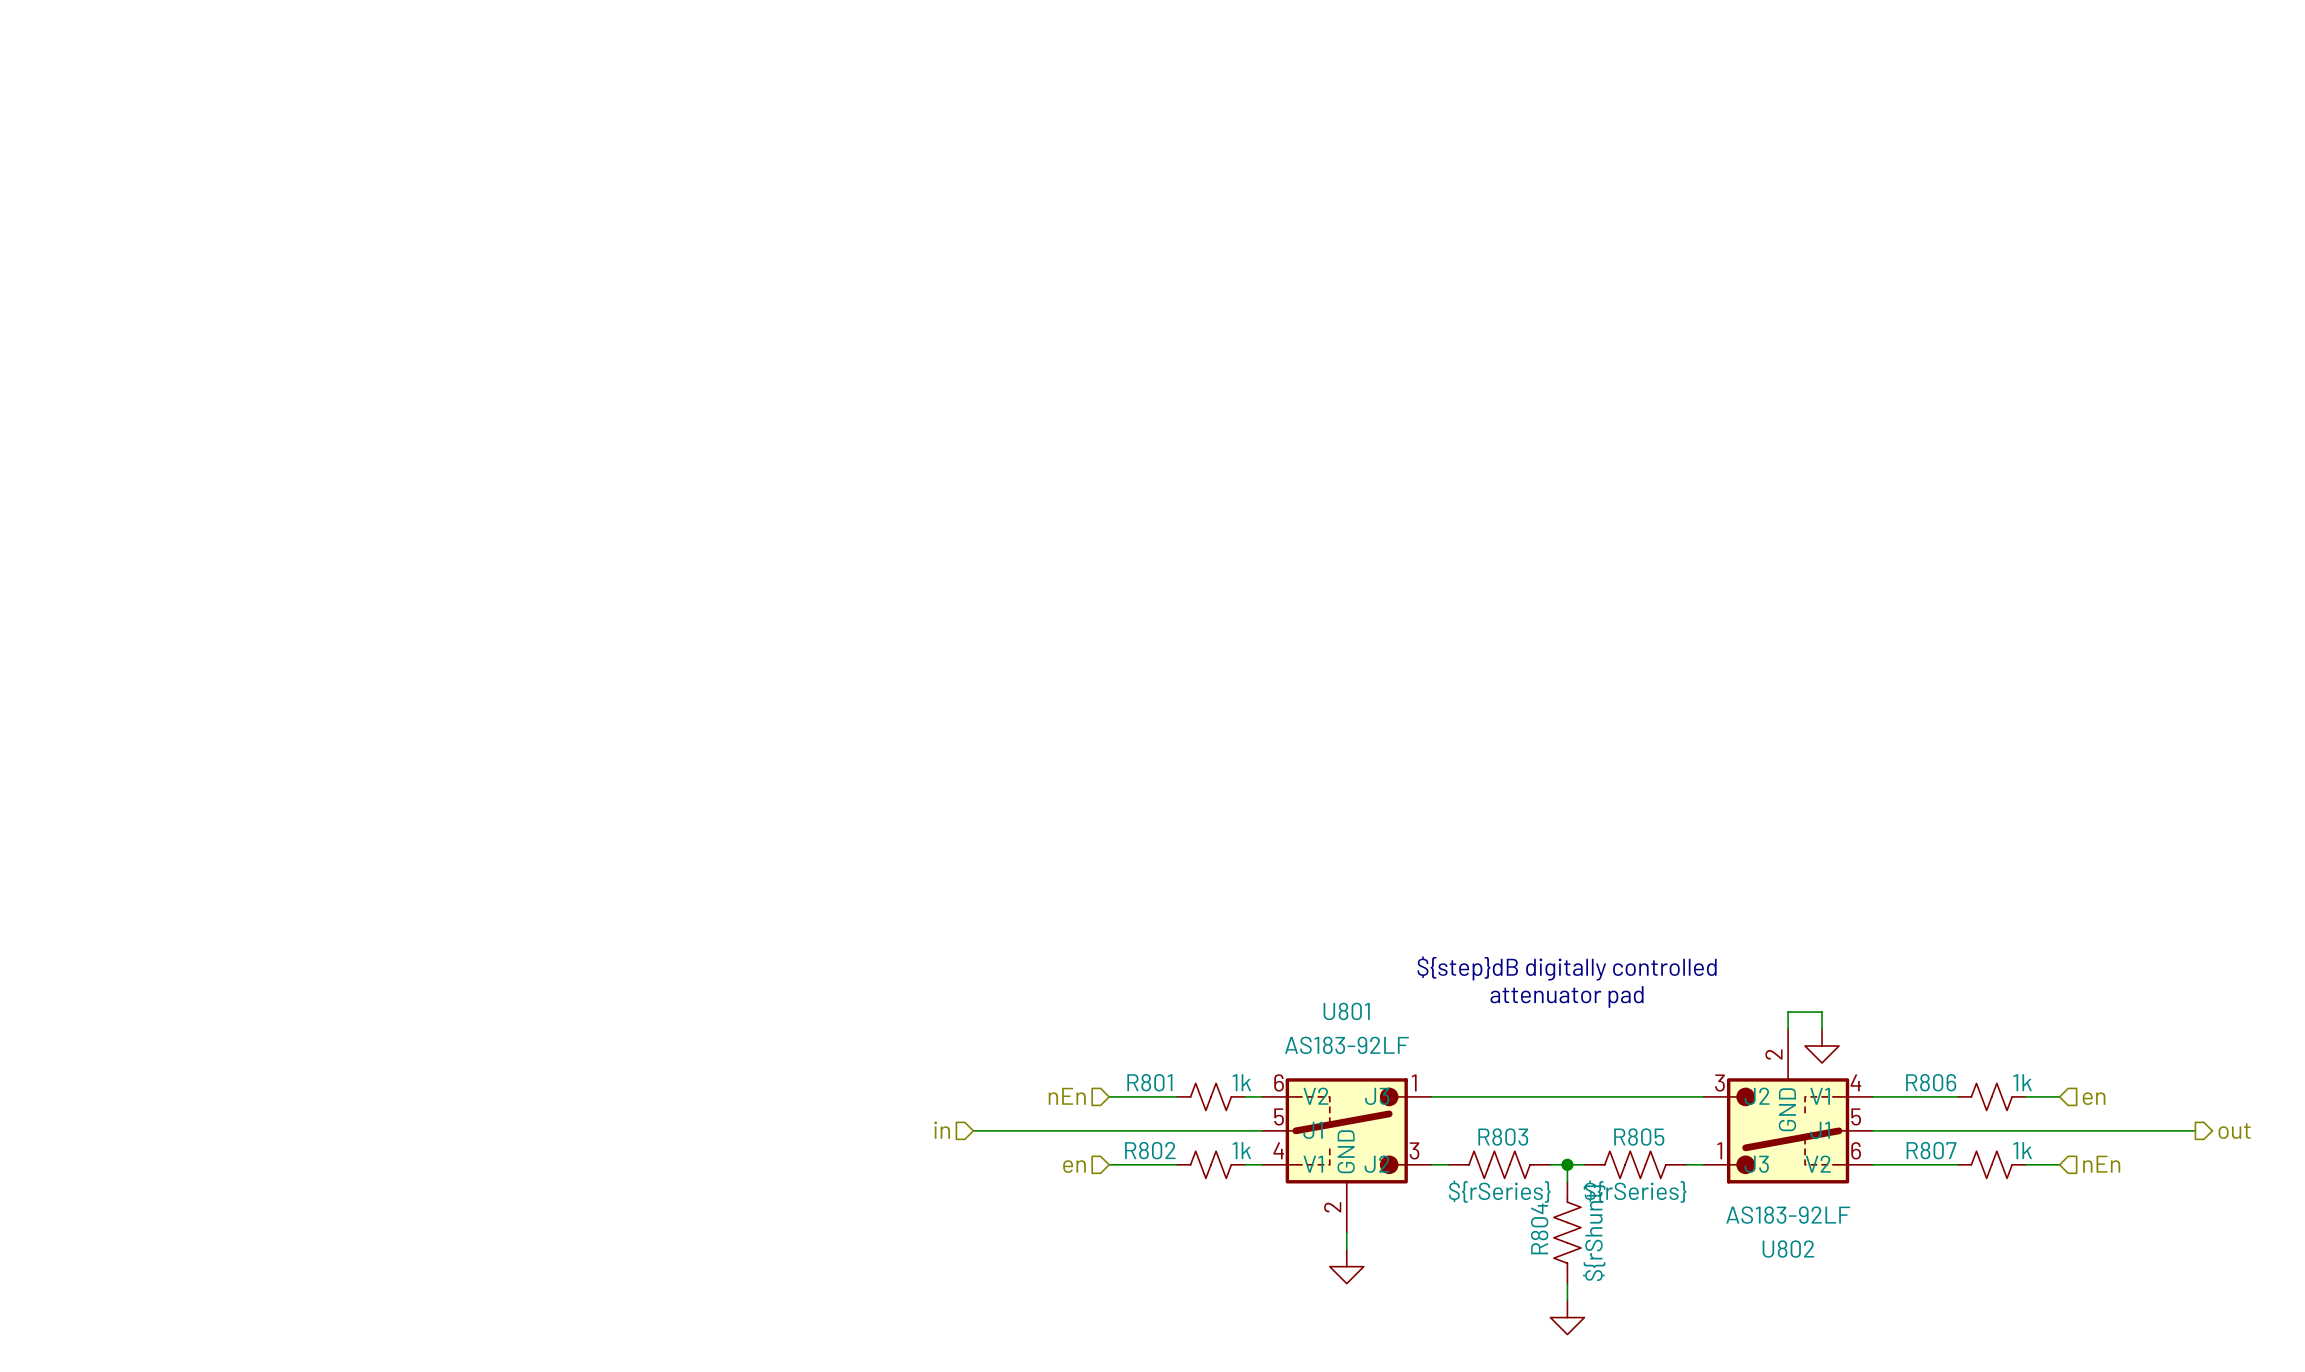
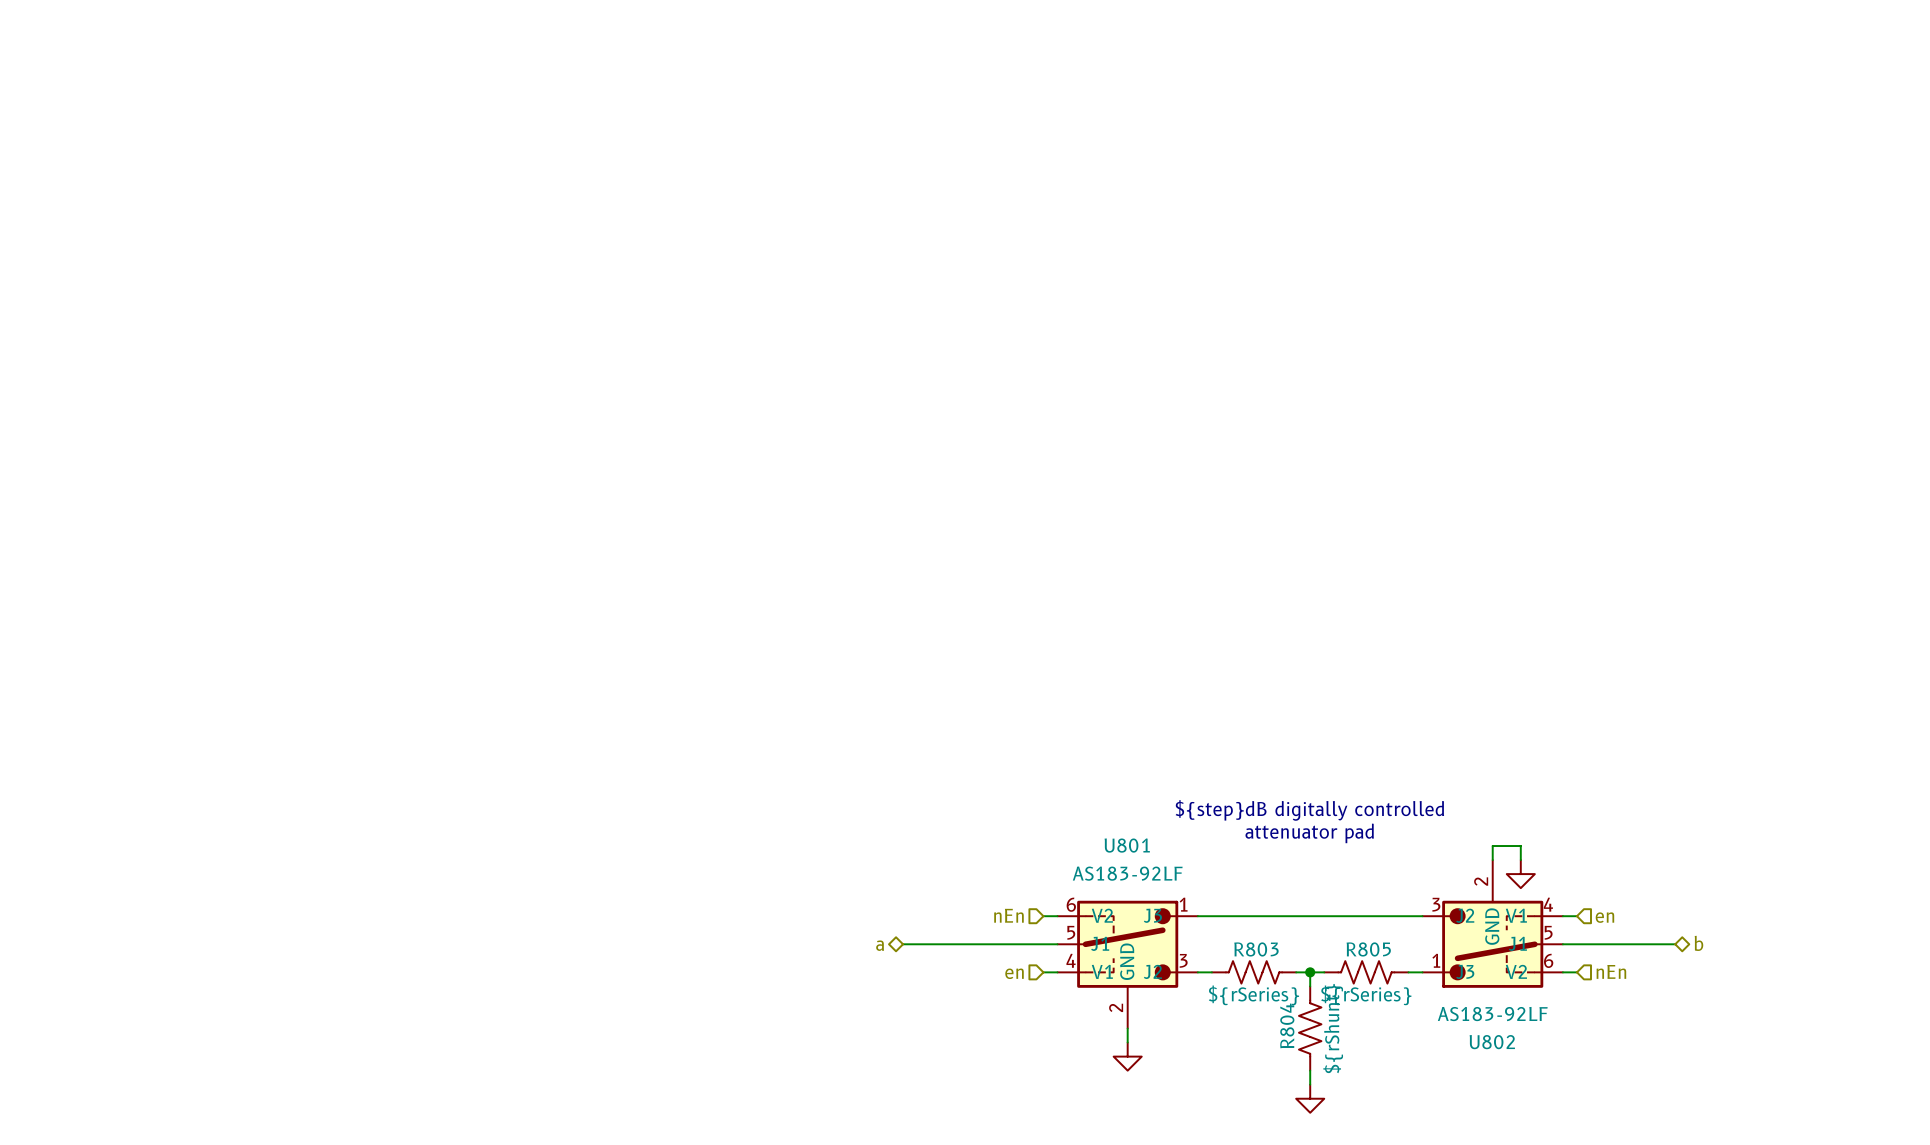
hierarchical label position: nEn (1067, 1096) -> nEn (1008, 915)
wire: (1109, 1096) (1177, 1096) -> none
R801: 1k (1210, 1096) -> none
wire: (1889, 1096) (1957, 1096) -> none
R806: 1k (1991, 1096) -> none
wire: (2025, 1096) (2059, 1096) -> none
hierarchical label position: en (2094, 1098) -> en (1604, 917)
hierarchical label: in (942, 1130) -> none
wire: (973, 1130) (1075, 1130) -> none
wire: (2008, 1130) (2195, 1130) -> none
hierarchical label: none -> b (1698, 943)
hierarchical label: out (2234, 1131) -> none
hierarchical label: none -> a (880, 945)
wire: (1109, 1164) (1177, 1164) -> none
R802: 1k (1210, 1164) -> none
wire: (1889, 1164) (1957, 1164) -> none
R807: 1k (1991, 1164) -> none
wire: (2025, 1164) (2059, 1164) -> none
hierarchical label position: nEn (2101, 1164) -> nEn (1611, 971)
hierarchical label position: en (1074, 1166) -> en (1014, 973)

